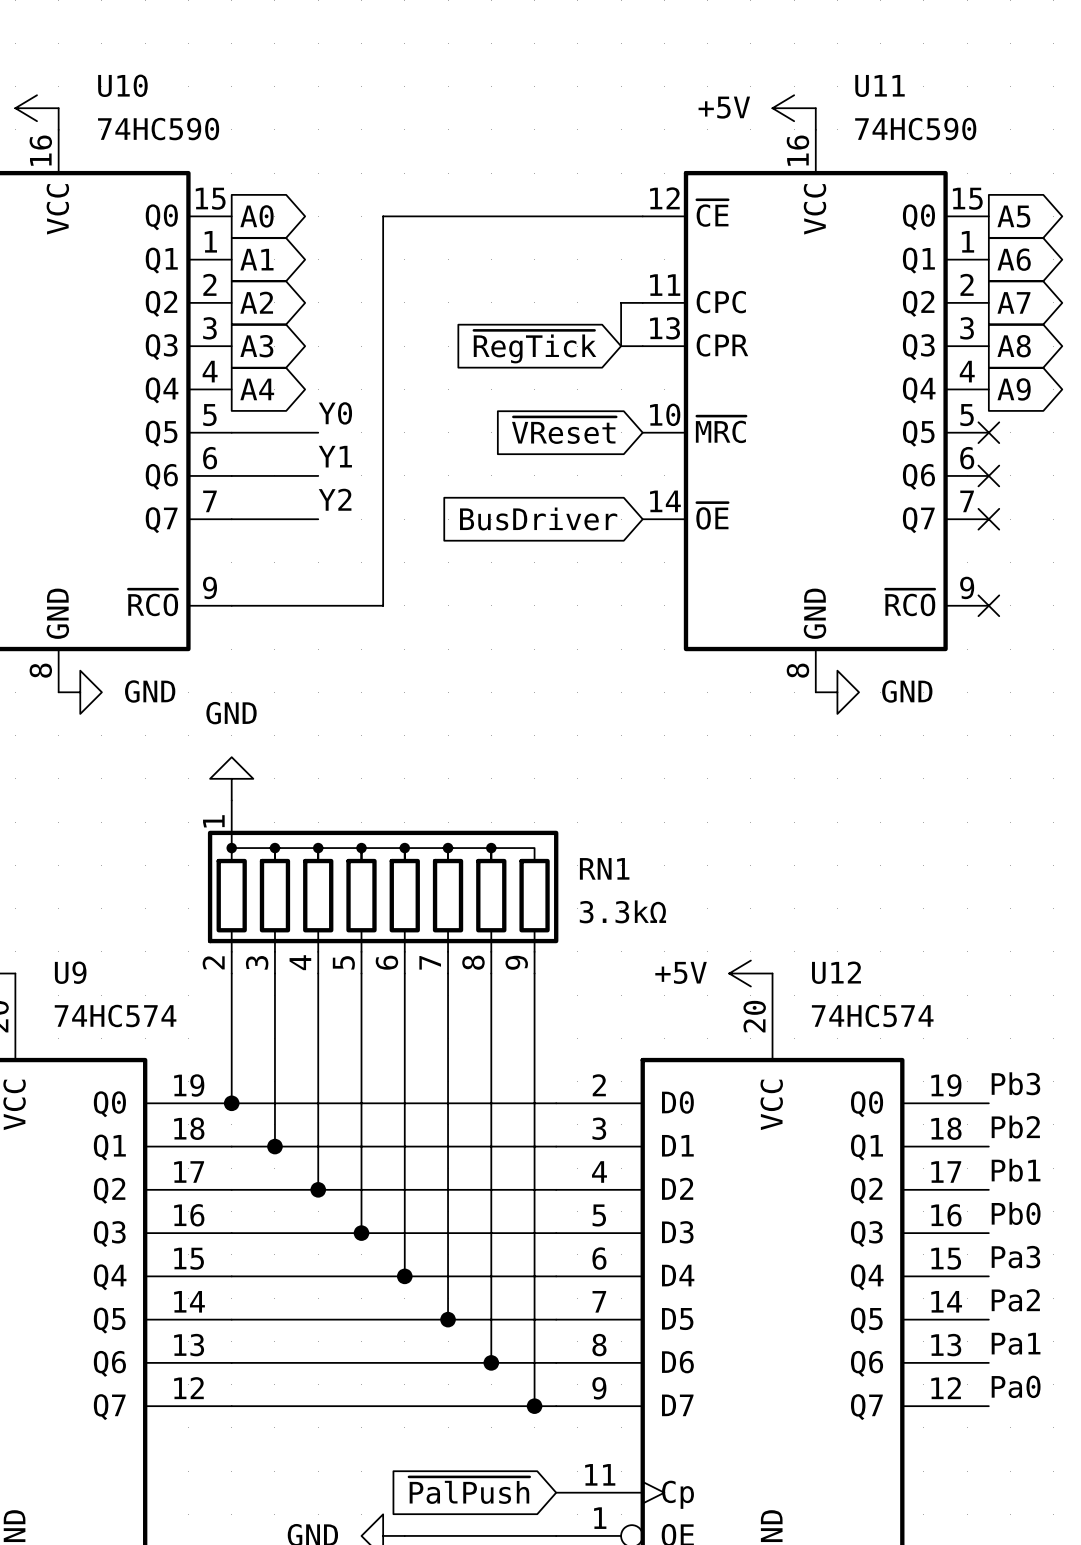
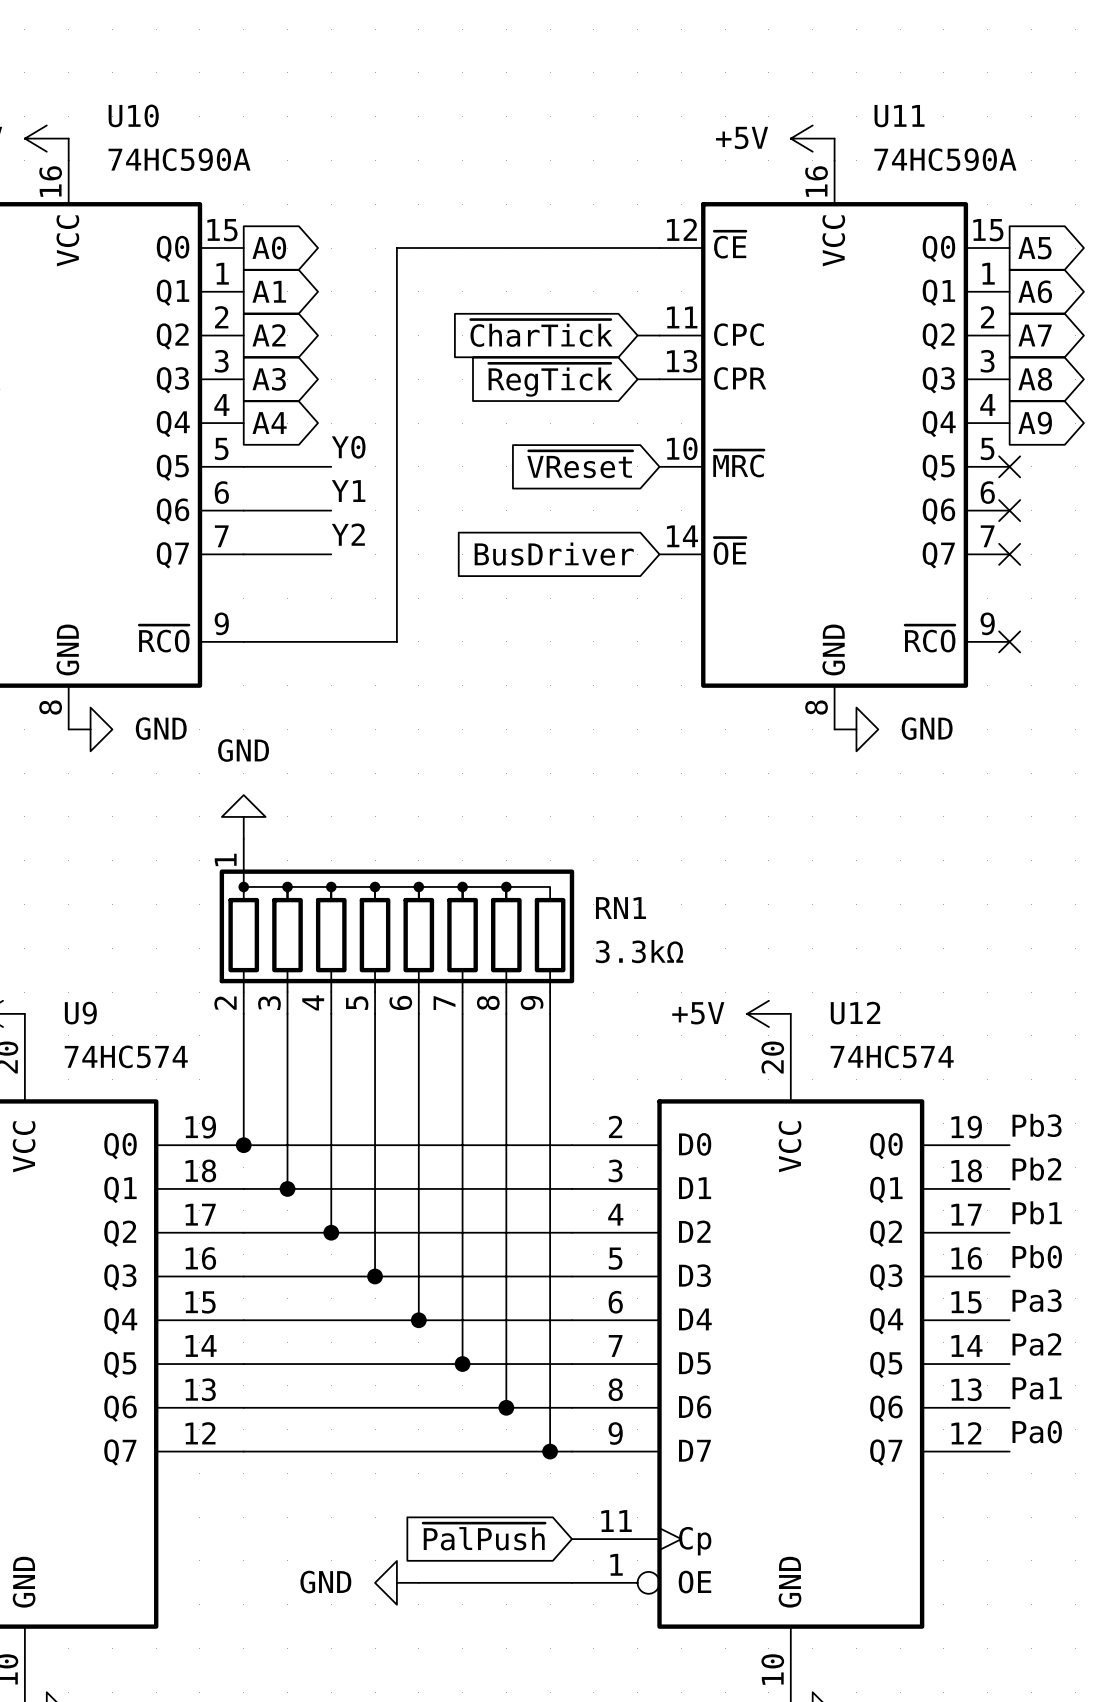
U10 value: 74HC590 (158, 129) -> 74HC590A (179, 159)
U11 value: 74HC590 (915, 129) -> 74HC590A (945, 159)
global label: none -> ~{CharTick} (541, 333)
wire: (621, 302) (621, 346) -> none

